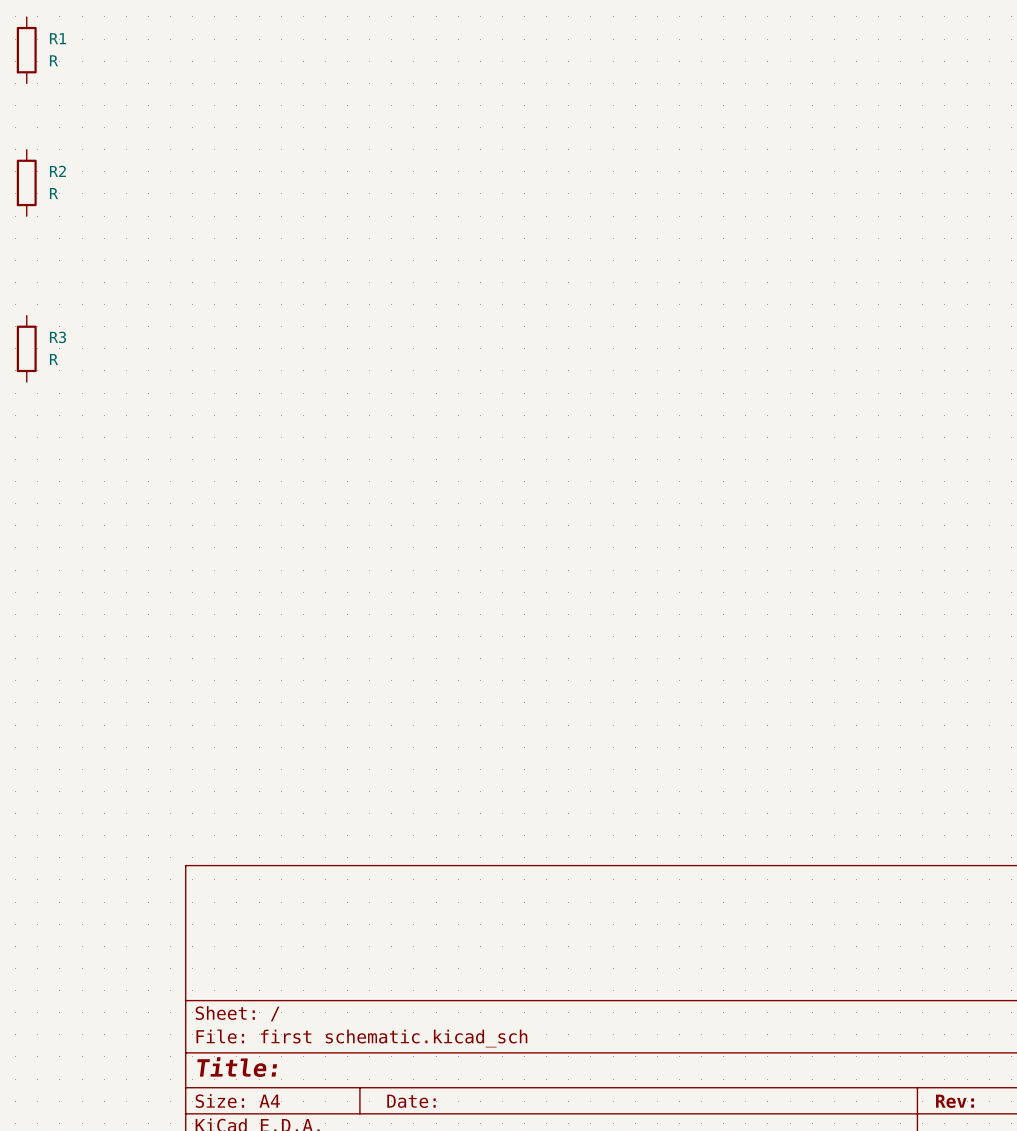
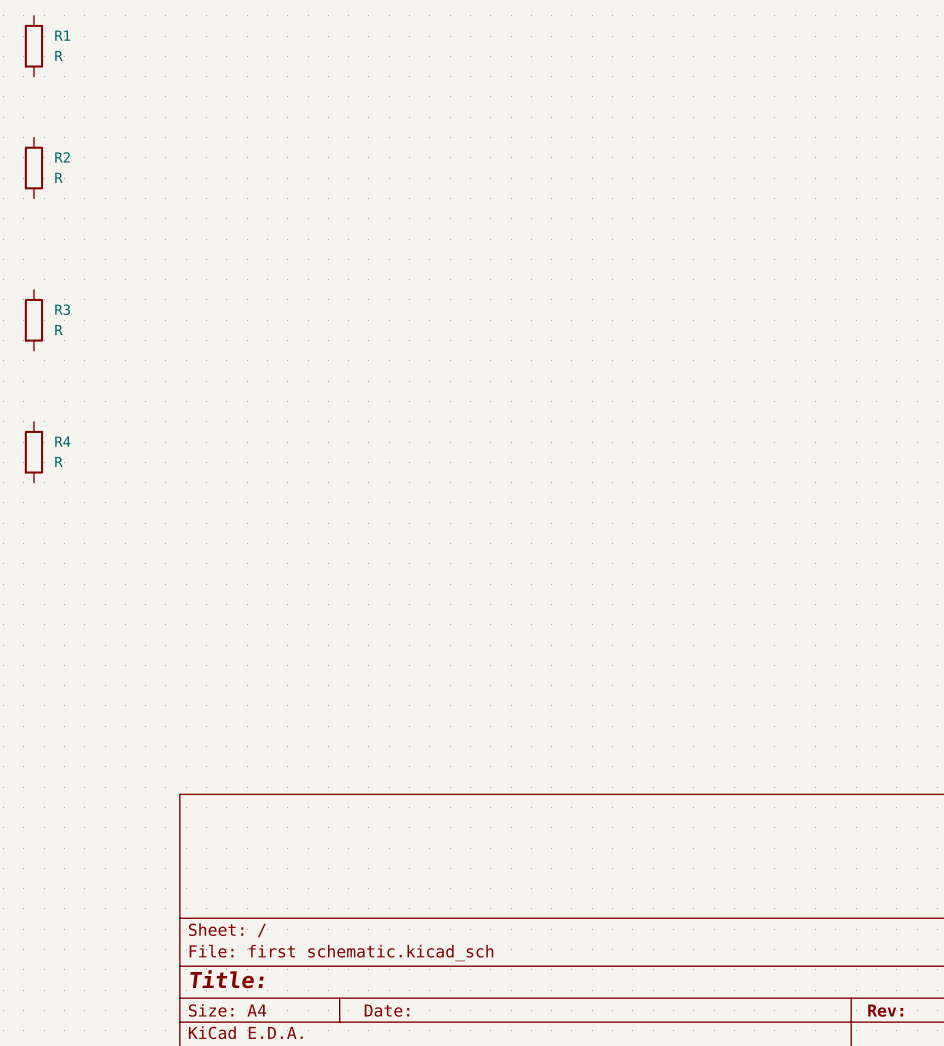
R4: none -> R (33, 452)

